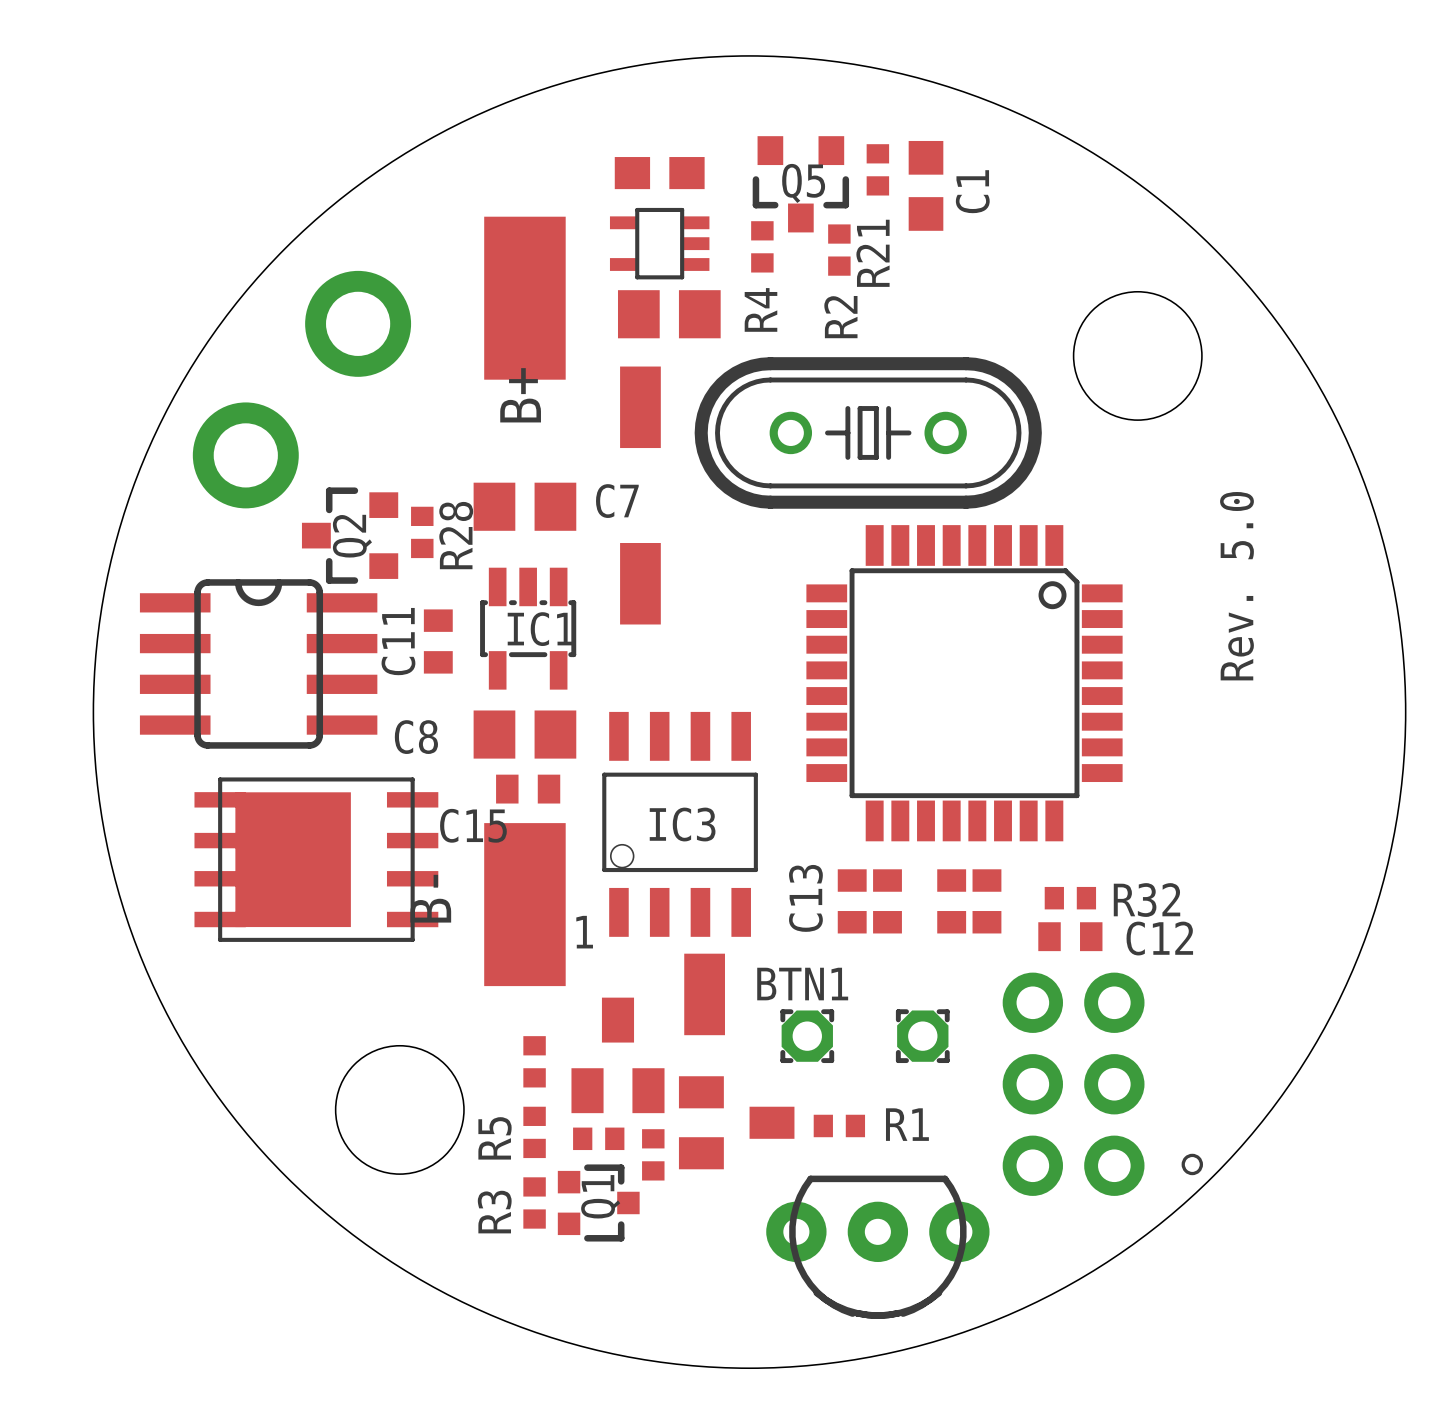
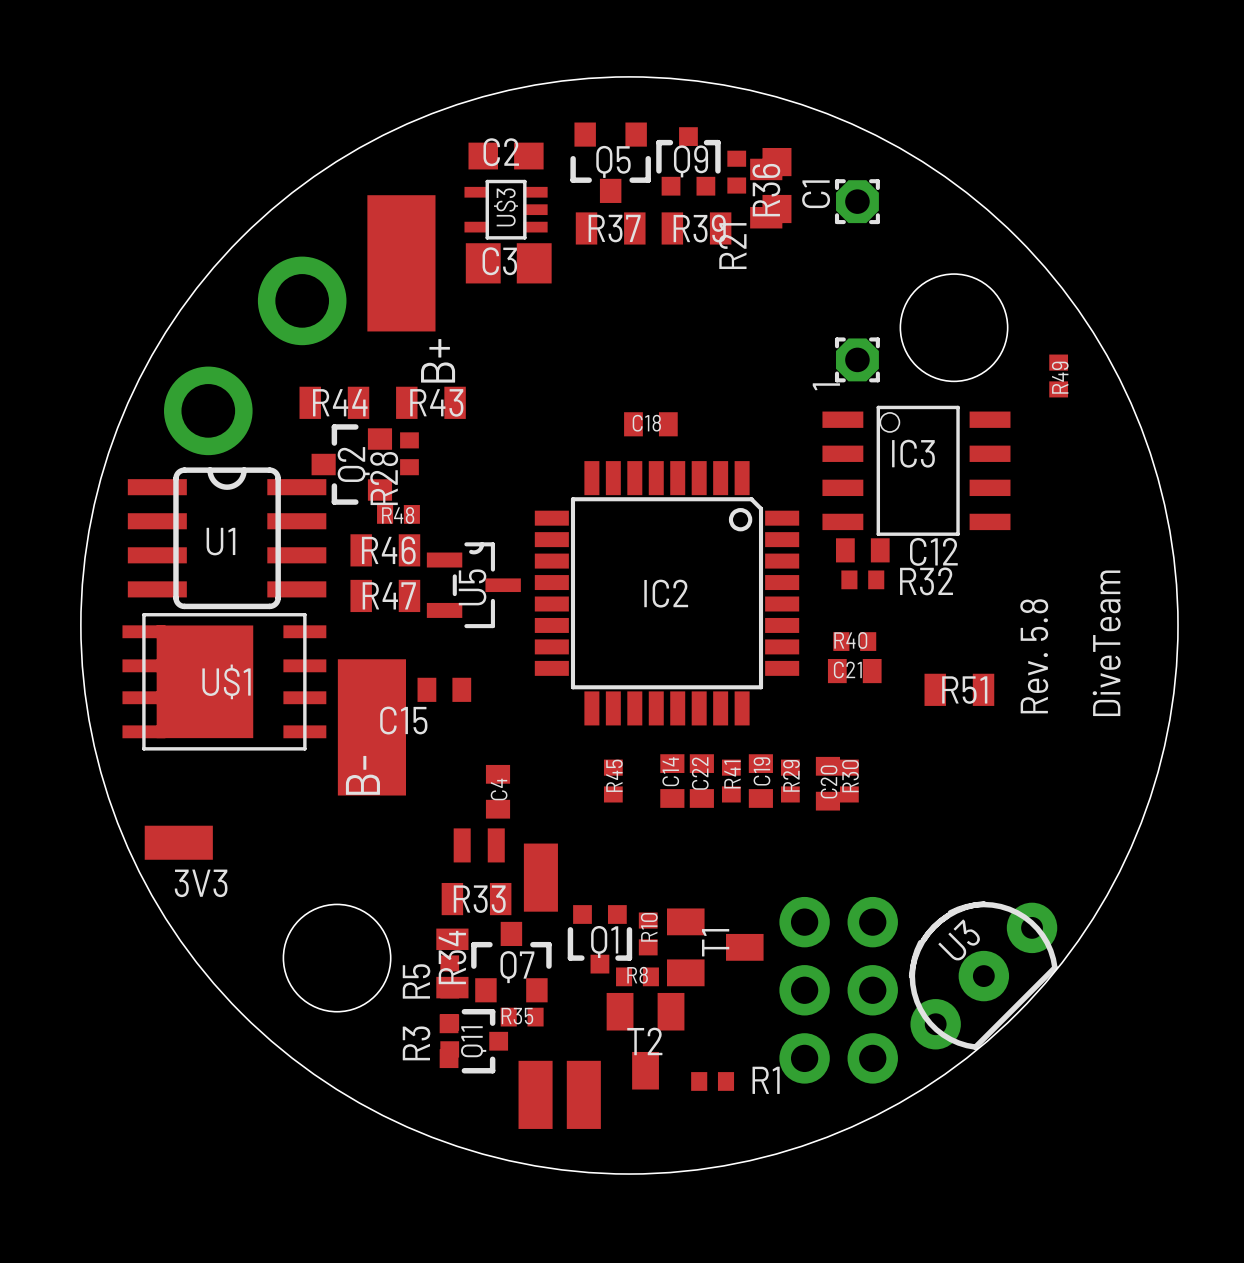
C2: none -> (506, 156)
Q9: none -> (688, 161)
part: (659, 173) -> none
Q5 position: (800, 184) -> (610, 162)
R36: none -> (766, 193)
part: none -> (857, 201)
U$3: none -> (506, 209)
R37: none -> (610, 228)
R39: none -> (696, 228)
part: (659, 243) -> none
R4: (762, 246) -> none
R2: (839, 250) -> none
C3: none -> (508, 263)
part position: (524, 298) -> (401, 263)
part: (669, 314) -> none
part: none -> (857, 359)
part: (640, 407) -> none
R49: none -> (1058, 375)
part: (868, 432) -> none
R44: none -> (334, 402)
R43: none -> (430, 402)
C18: none -> (650, 424)
C7: (524, 506) -> none
R28 position: (422, 532) -> (409, 453)
Q2 position: (350, 535) -> (351, 464)
R48: none -> (398, 514)
part: (640, 583) -> none
text: Rev. 5.0 (1236, 586) -> Rev. 5.8 (1034, 656)
U1: none -> (227, 538)
R46: none -> (385, 550)
IC1: (528, 628) -> none
C11: (438, 641) -> none
part: (258, 663) -> none
U5: none -> (473, 585)
IC2: none -> (666, 593)
R47: none -> (385, 595)
part: (964, 683) -> none
IC3 footprint: [602, 711, 758, 937] -> [822, 405, 1011, 536]
text: none -> DiveTeam (1106, 643)
R40: none -> (854, 641)
C8: (524, 734) -> none
C21: none -> (854, 671)
U$1: none -> (224, 681)
R51: none -> (959, 689)
part: (316, 859) -> none
C19 name: none -> C19 (761, 771)
R45: none -> (613, 781)
C14: none -> (672, 781)
C13 name: C13 (805, 898) -> C22 (700, 773)
R41: none -> (731, 781)
R29: none -> (790, 781)
R30: none -> (849, 781)
R32 position: (1070, 898) -> (862, 579)
C20 name: none -> C20 (829, 781)
C13 position: (852, 901) -> (701, 781)
C19 position: (887, 901) -> (760, 781)
part: (951, 901) -> none
part position: (524, 904) -> (371, 727)
C4: none -> (498, 791)
C12 position: (1070, 936) -> (862, 550)
3V3: none -> (178, 842)
part: none -> (479, 845)
part position: (704, 994) -> (540, 877)
BTN1: (807, 1036) -> none
part: (922, 1036) -> none
R33: none -> (476, 899)
part: (617, 1055) -> none
part: (534, 1061) -> none
R10: none -> (648, 933)
part position: (1073, 1084) -> (838, 990)
T1: none -> (715, 947)
Q7: none -> (511, 962)
R34: none -> (452, 963)
part: (736, 1122) -> none
R1 position: (839, 1125) -> (712, 1081)
U3: none -> (983, 975)
R8: none -> (637, 976)
part: (598, 1138) -> none
drawing: [1181, 1153, 1204, 1176] -> none
part: (653, 1154) -> none
R35: none -> (522, 1017)
Q1 rotation: 0° (598, 1202) -> 90° clockwise (599, 939)
Q1 position: (598, 1202) -> (599, 939)
Q11: none -> (473, 1041)
T2: none -> (645, 1041)
part: (877, 1247) -> none
part: none -> (535, 1094)
part: none -> (583, 1094)

